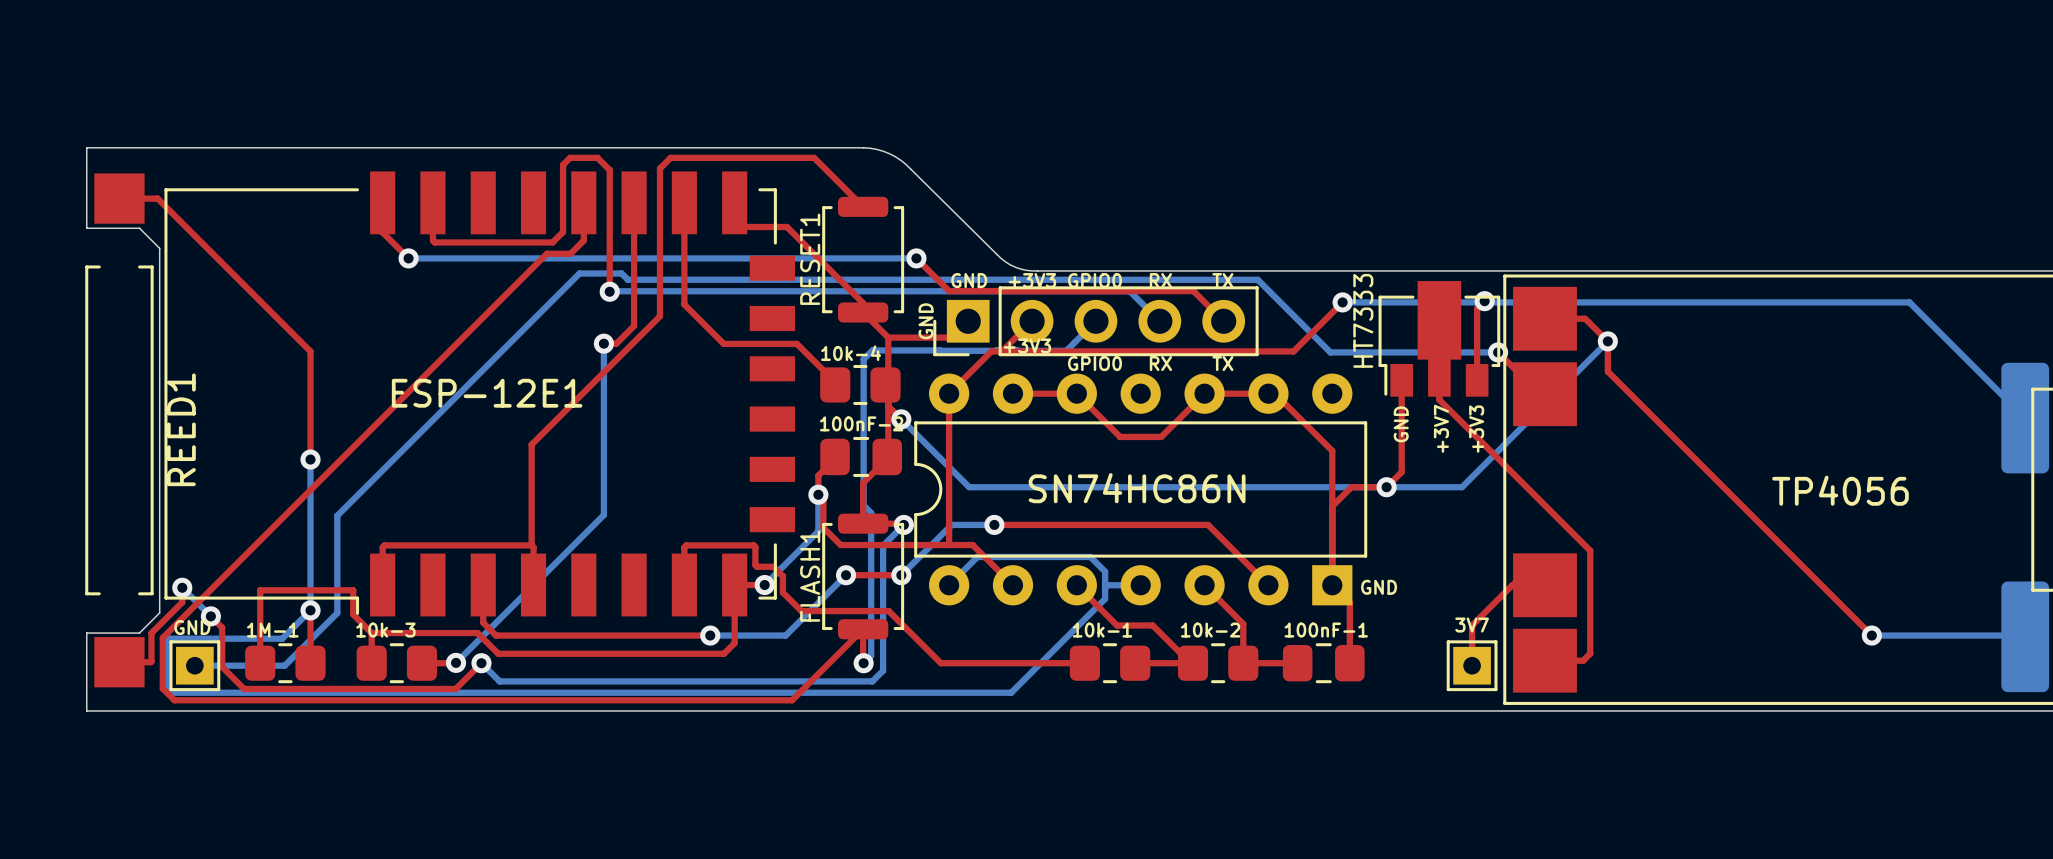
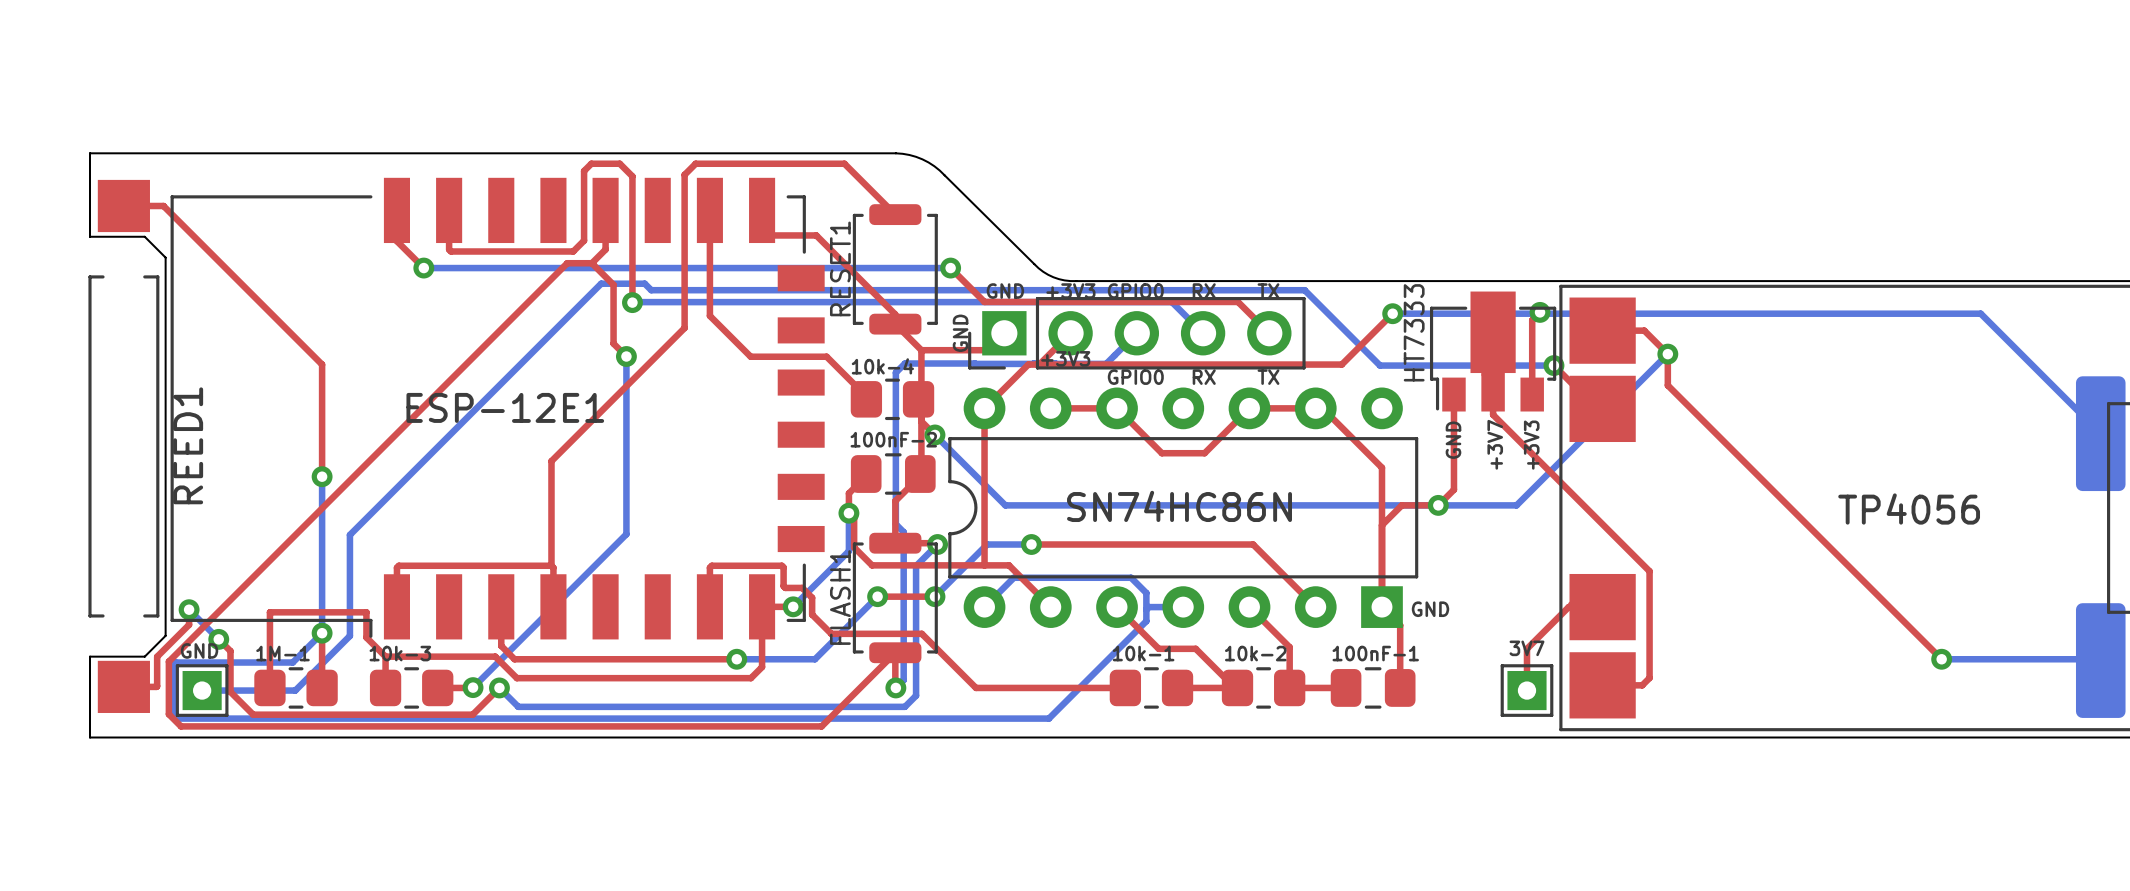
top track: (634, 202) (634, 325) (616, 343) (603, 343) -> (591, 263) (613, 284) (613, 343) (626, 356)

